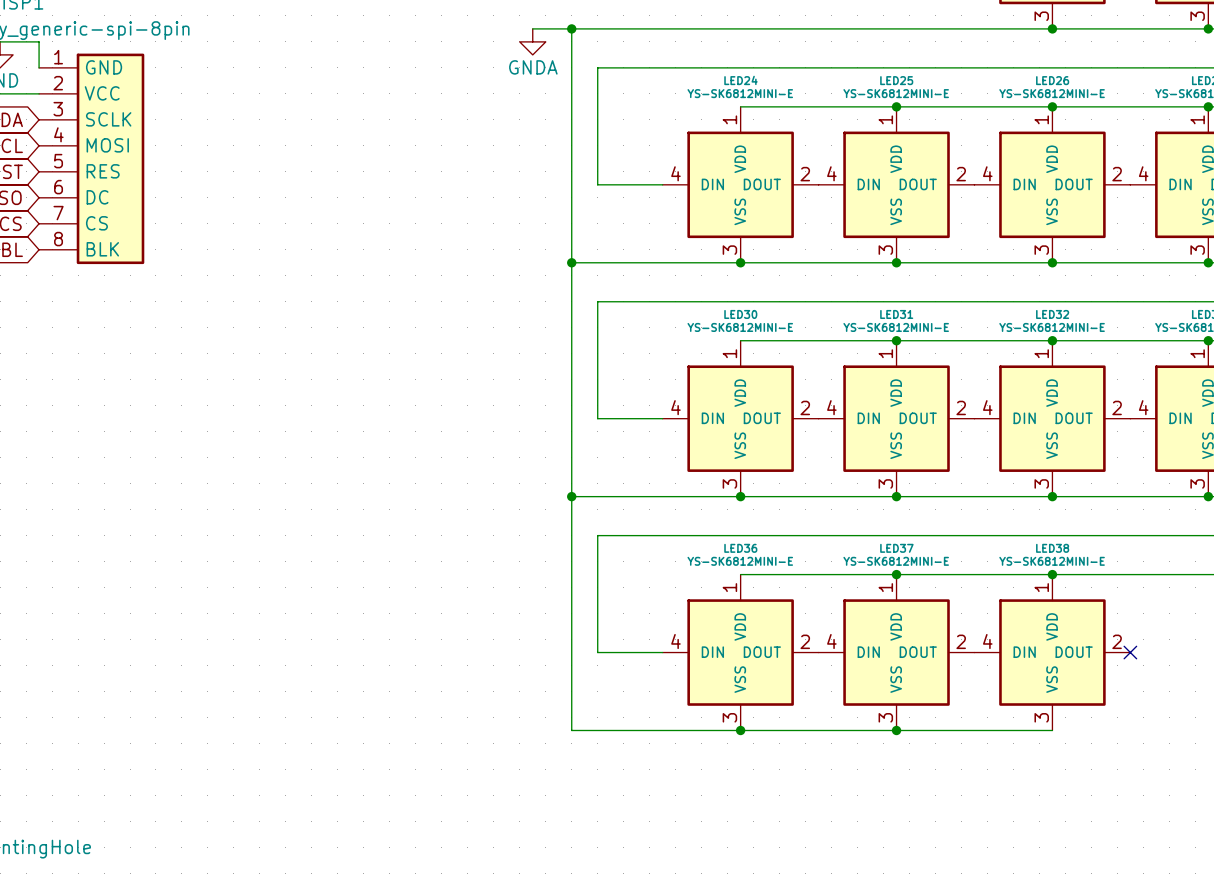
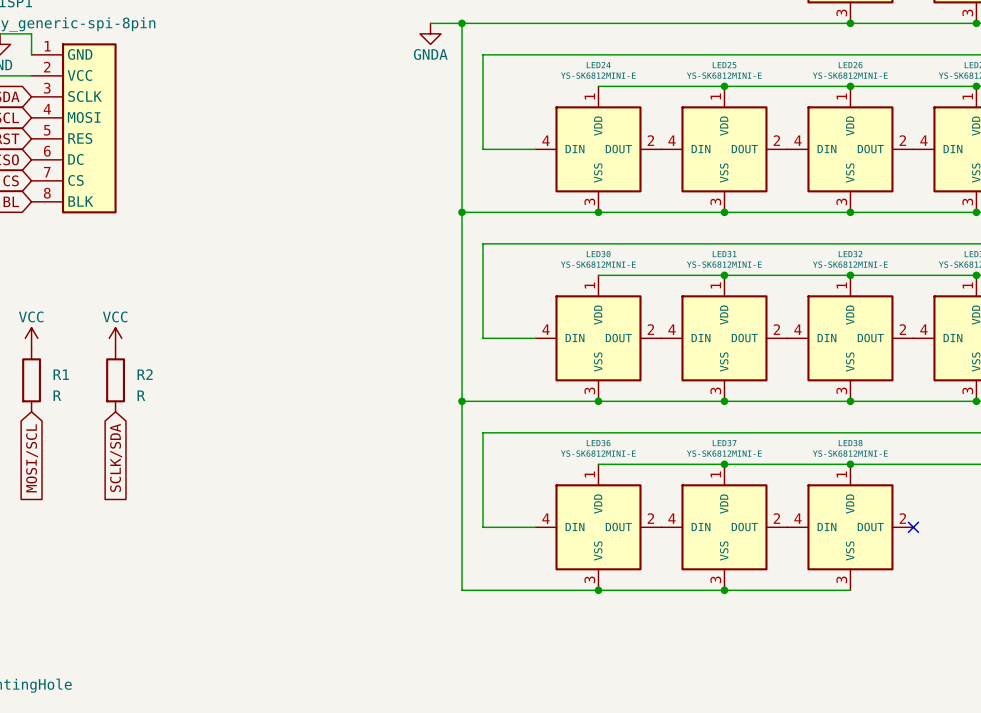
power symbol: none -> VCC (31, 338)
power symbol: none -> VCC (115, 338)
R1: none -> R (31, 380)
R2: none -> R (115, 380)
global label: none -> MOSI/SCL (32, 458)
global label: none -> SCLK/SDA (116, 457)

